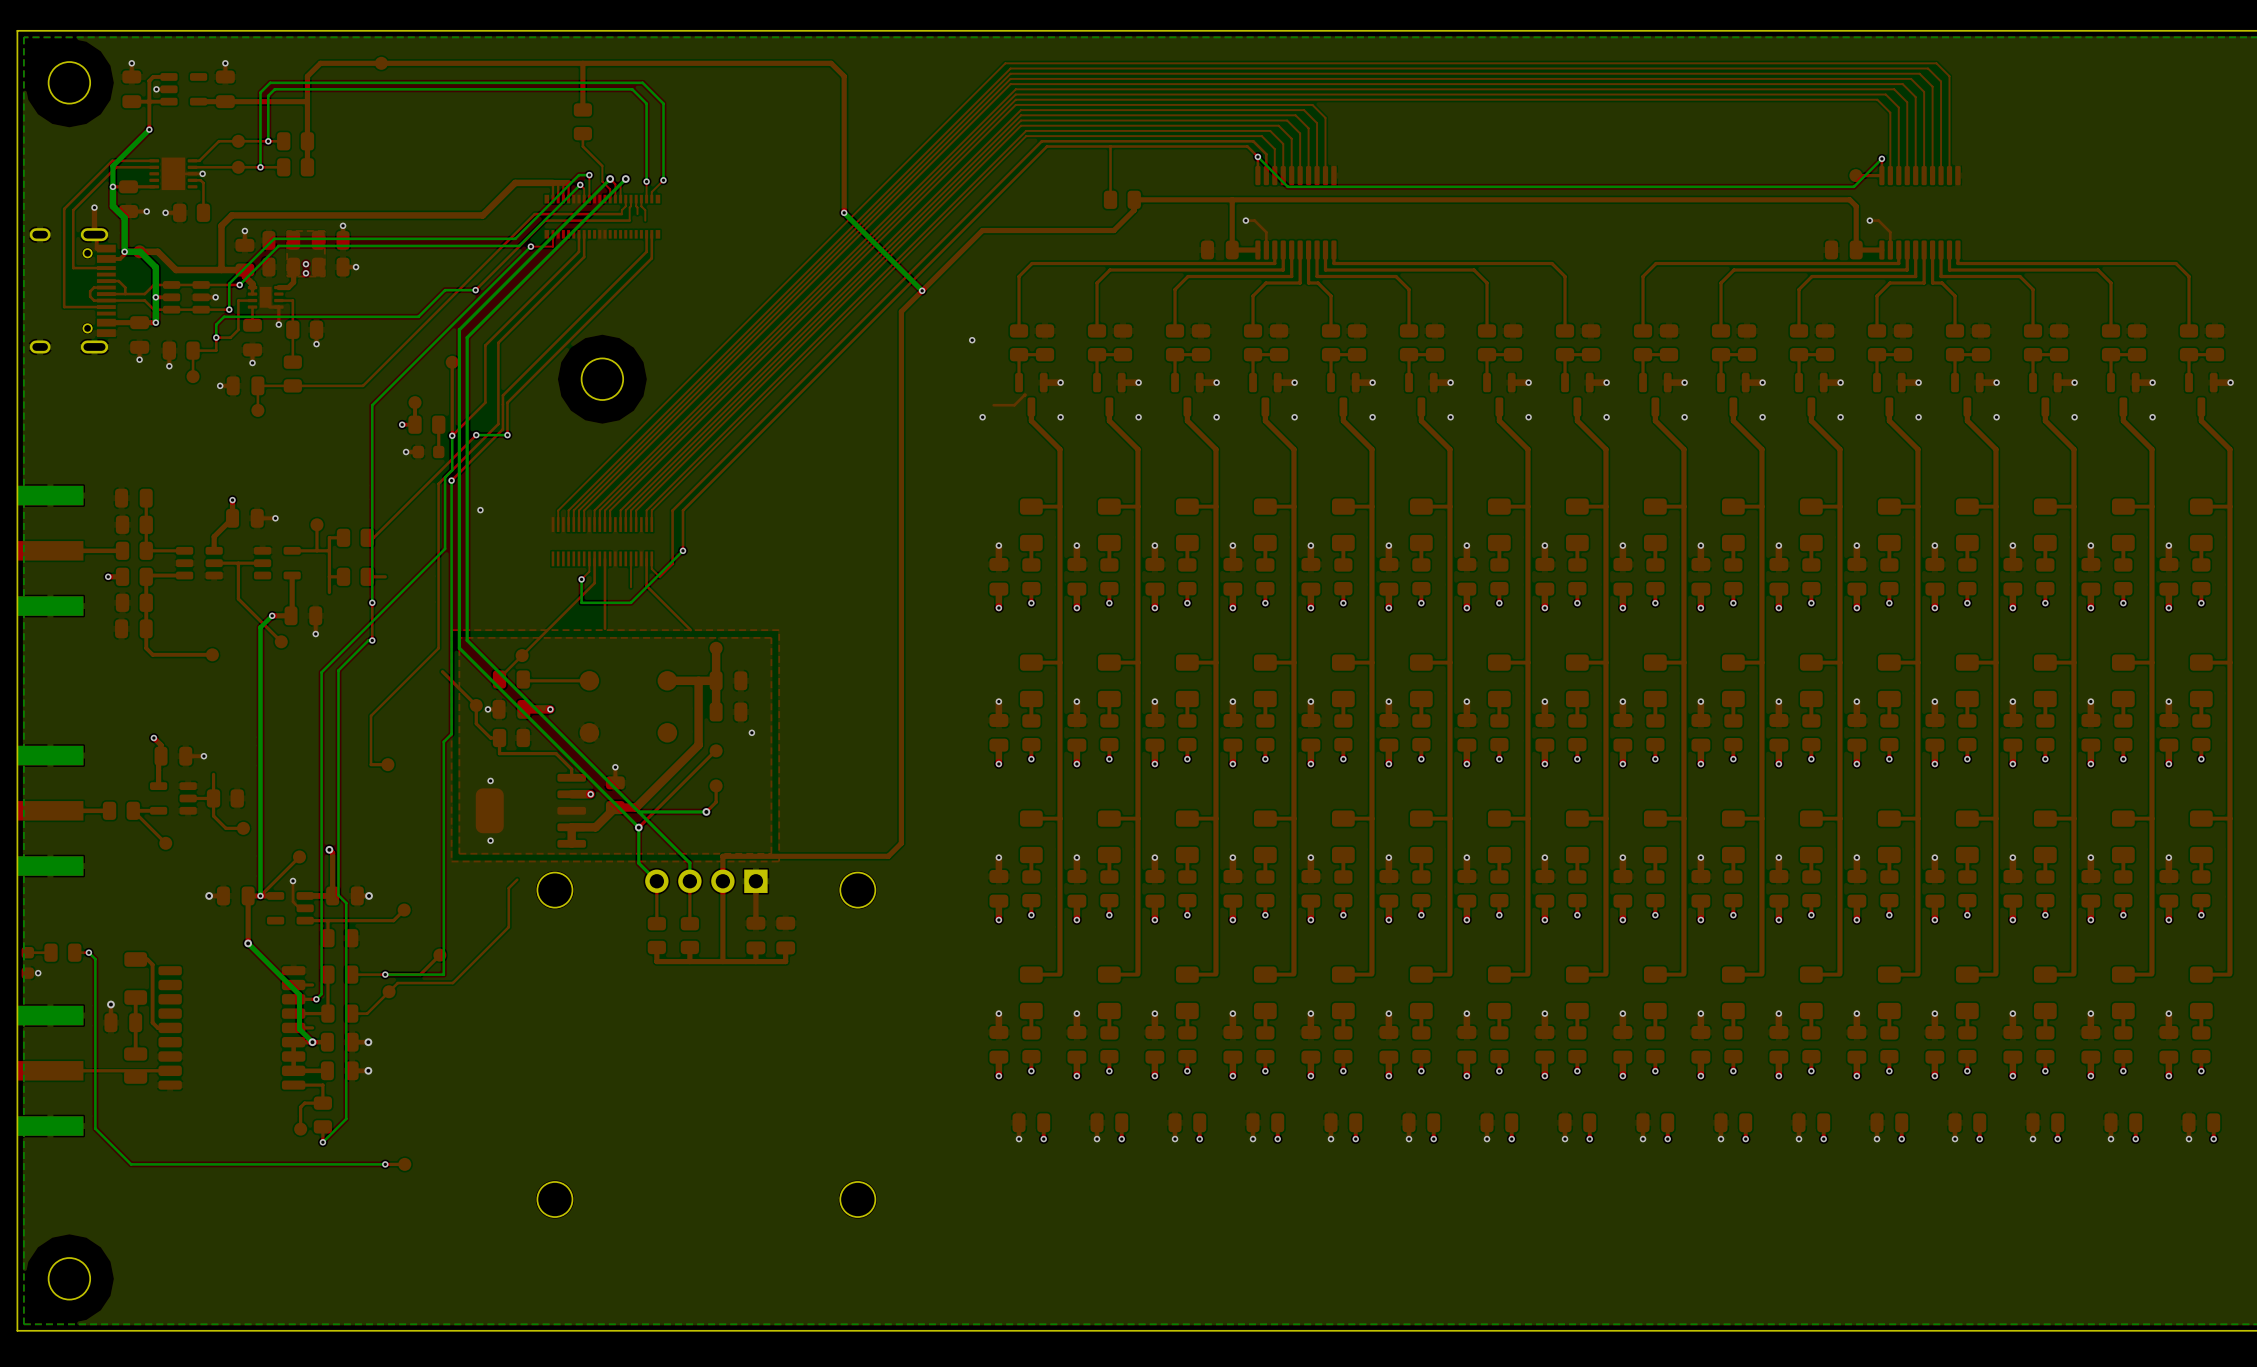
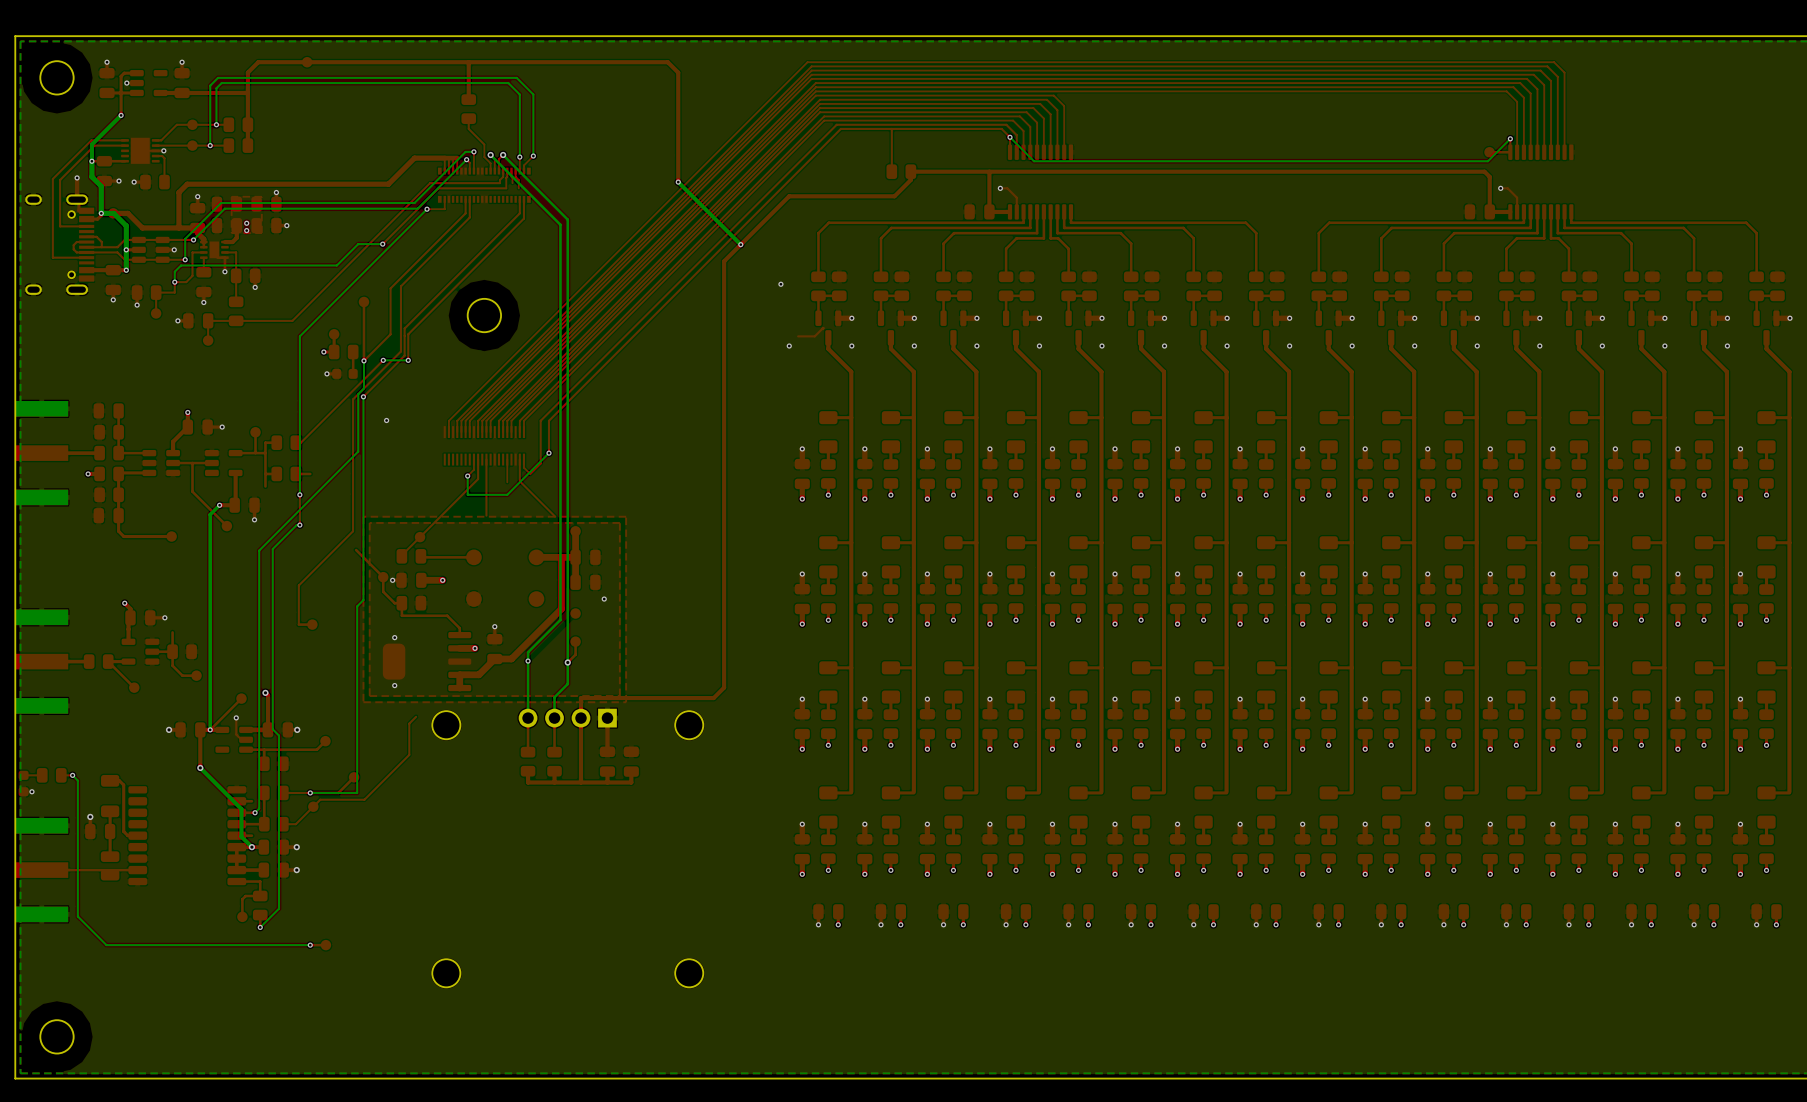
bottom track: (610, 179) (459, 329) (459, 648) (638, 827) (638, 863) (656, 881) -> (490, 154) (560, 224) (560, 619) (528, 652) (528, 718)
bottom track: (625, 179) (467, 337) (467, 640) (689, 863) -> (503, 154) (567, 219) (567, 684) (554, 697) (554, 703)
top track: (715, 750) (638, 827) -> none
via: none -> (528, 661)
bottom track: (706, 811) (638, 811) -> none
via: (638, 827) -> none

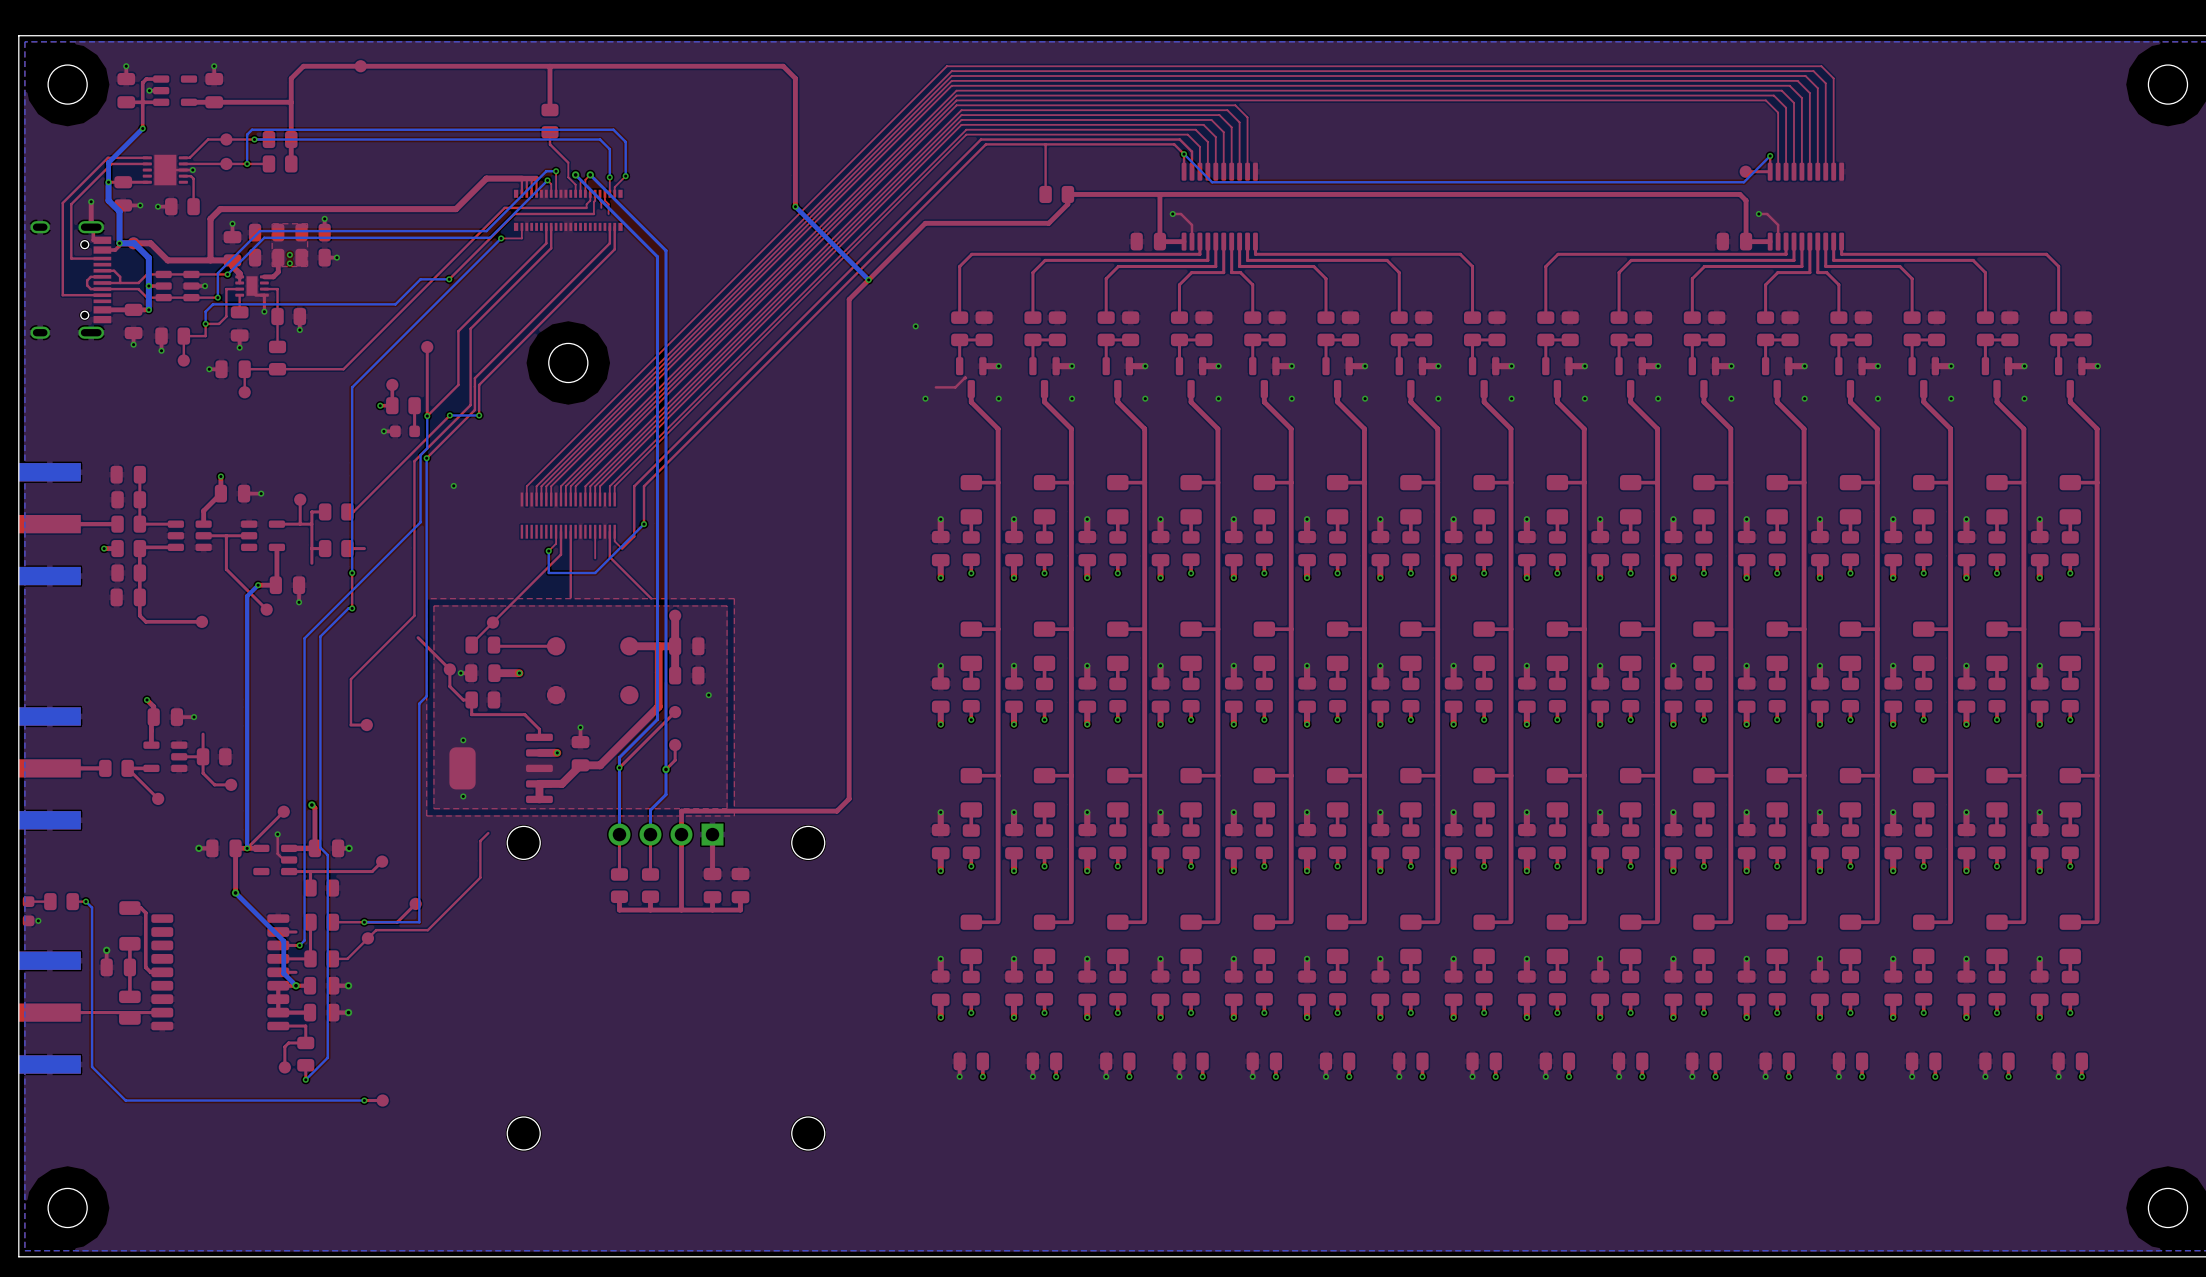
bottom track: (210, 120) (210, 85) (218, 77) (516, 77) (533, 94) (533, 126) -> (247, 134) (252, 129) (613, 129) (625, 141)
bottom track: (216, 124) (216, 88) (221, 83) (508, 83) (519, 94) (519, 133) -> (254, 139) (600, 139) (609, 149)
top track: none -> (675, 712) (619, 767)

